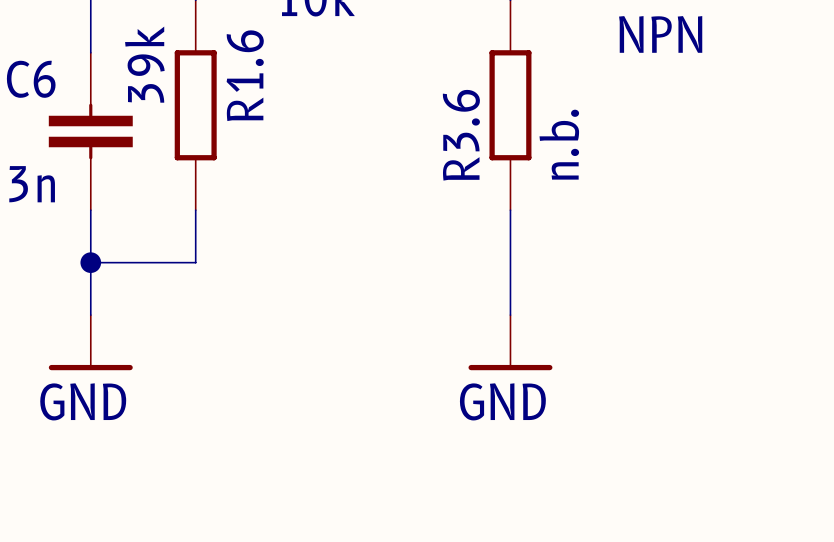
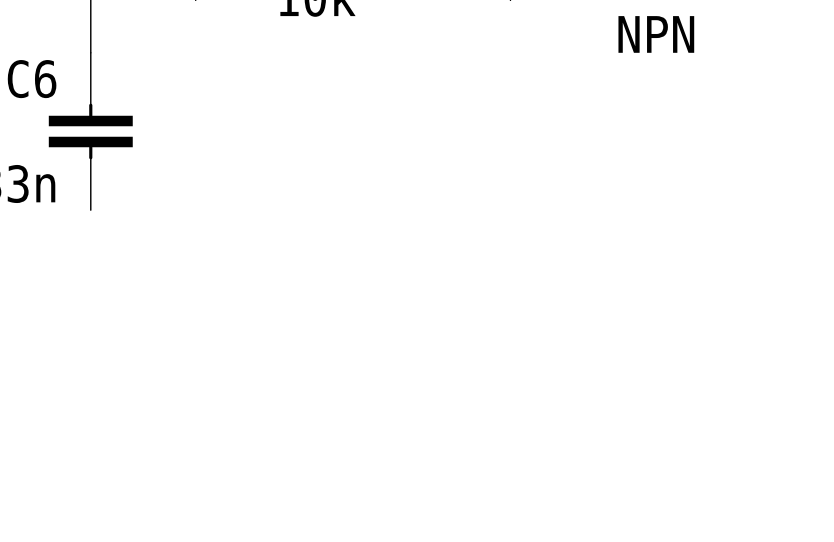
R1.6: 39k (195, 105) -> none
R3.6: n.b. (510, 105) -> none
wire: (90, 210) (90, 315) -> none
wire: (195, 210) (195, 262) (90, 262) -> none
wire: (510, 210) (510, 315) -> none
junction: (90, 262) -> none
power symbol: GND (90, 342) -> none
power symbol: GND (510, 342) -> none

